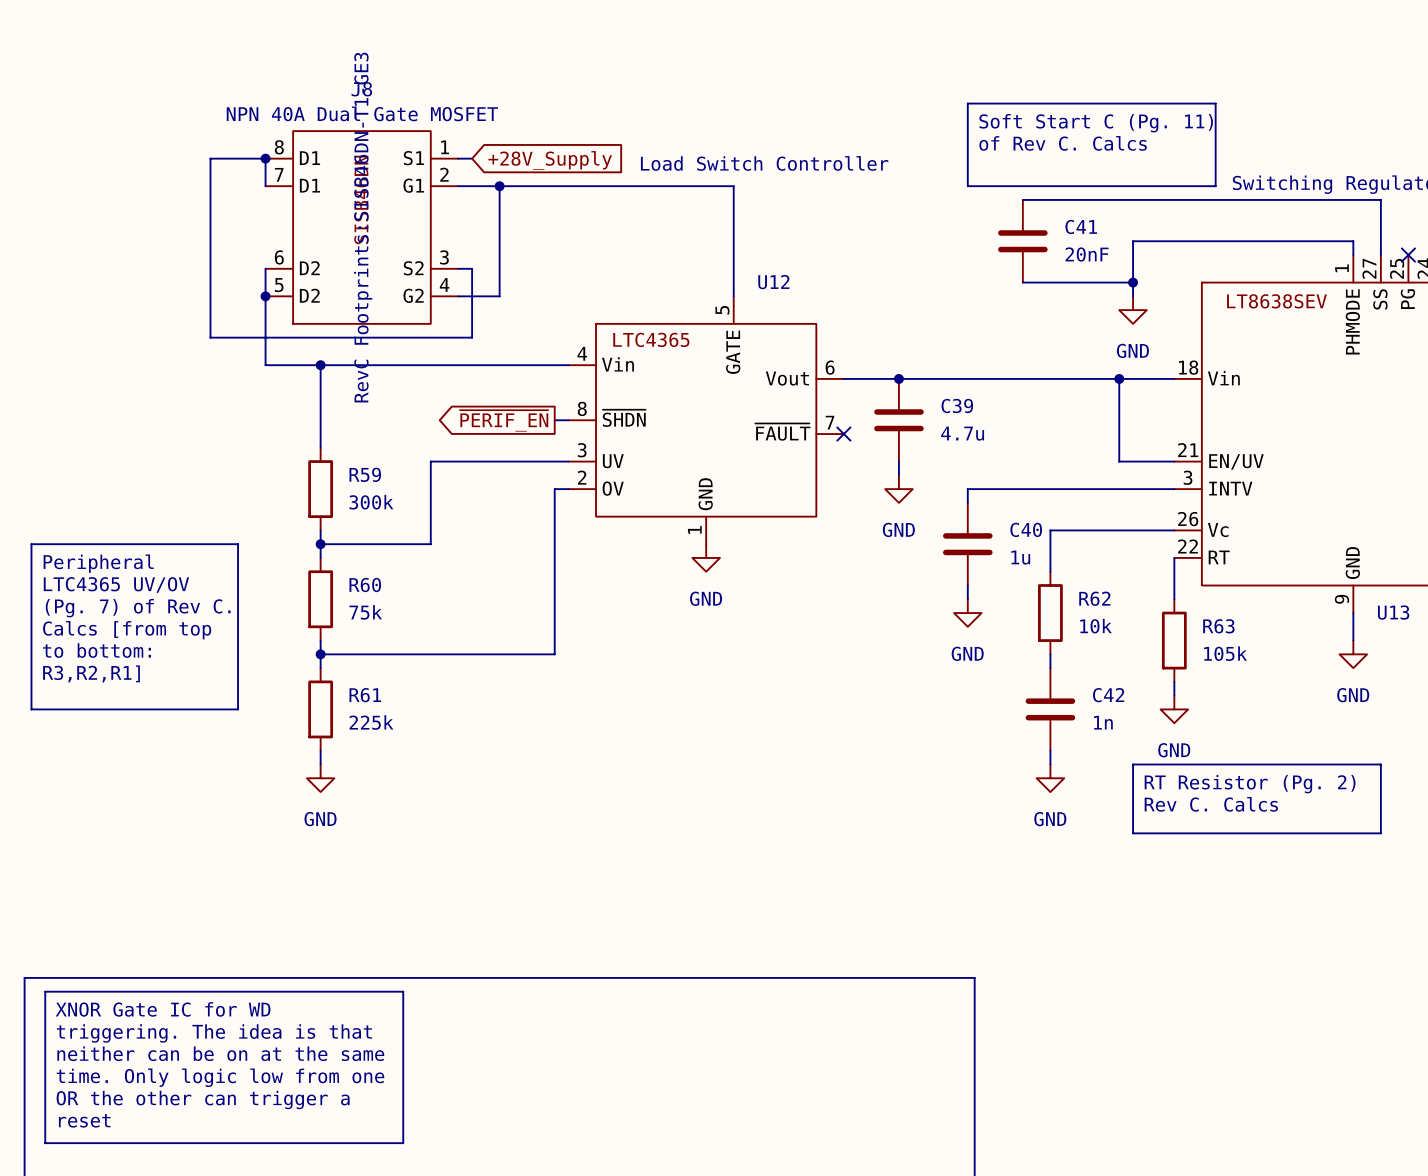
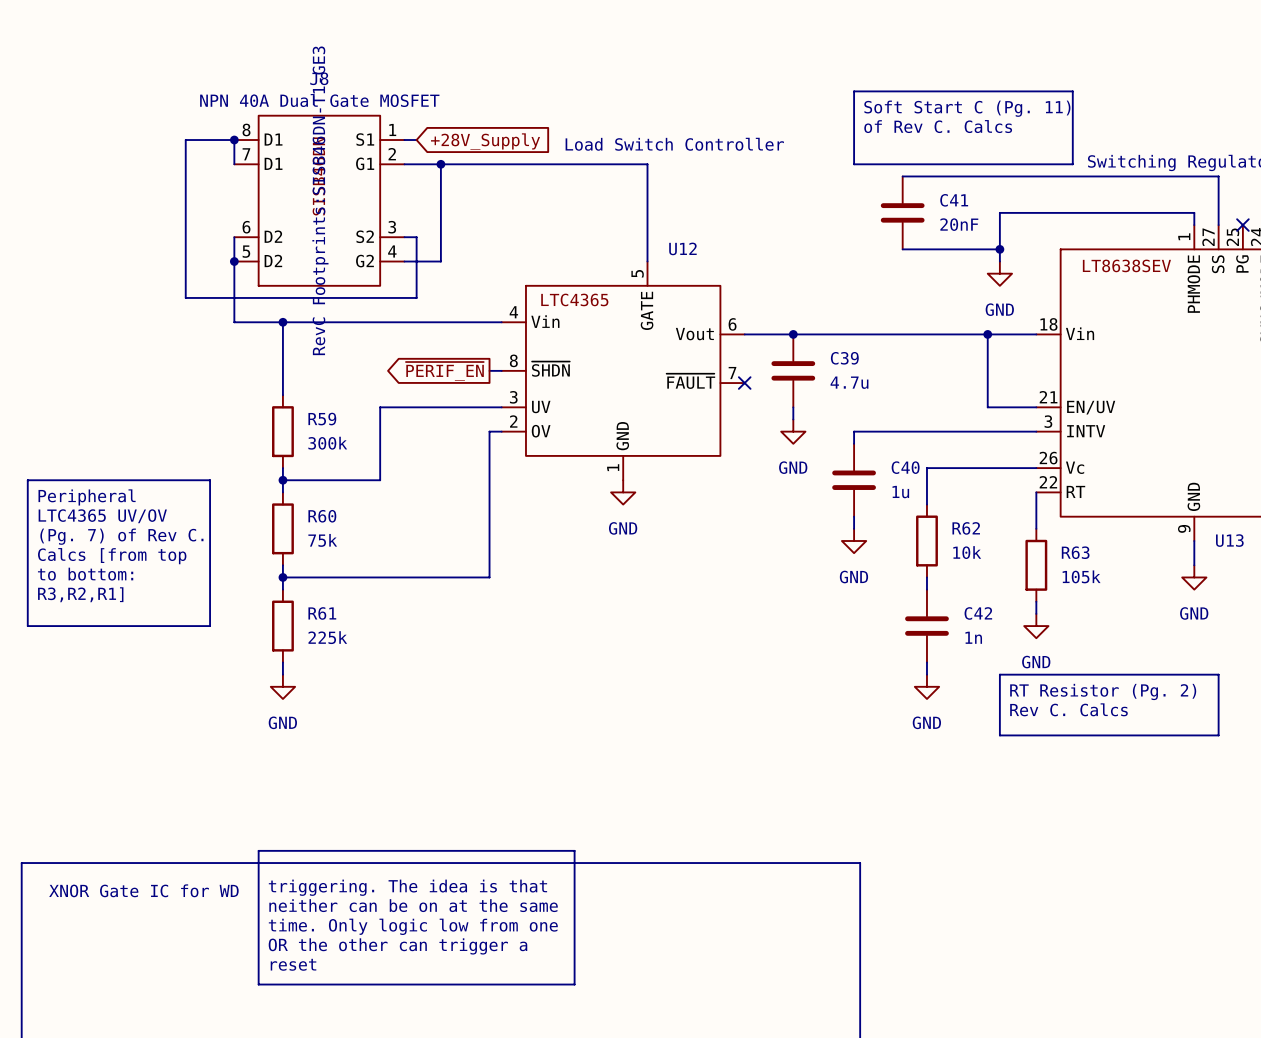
line: (45, 991) (403, 991) (403, 1143) (45, 1143) (45, 991) -> (258, 850) (574, 850) (574, 984) (258, 984) (258, 850)
text position: triggering. The idea is that (214, 1033) -> triggering. The idea is that (407, 887)
text position: neither can be on at the same (220, 1053) -> neither can be on at the same (413, 905)
text position: time. Only logic low from one (220, 1077) -> time. Only logic low from one (413, 926)
text position: OR the other can trigger a (203, 1099) -> OR the other can trigger a (397, 946)
text position: reset (84, 1120) -> reset (293, 964)

